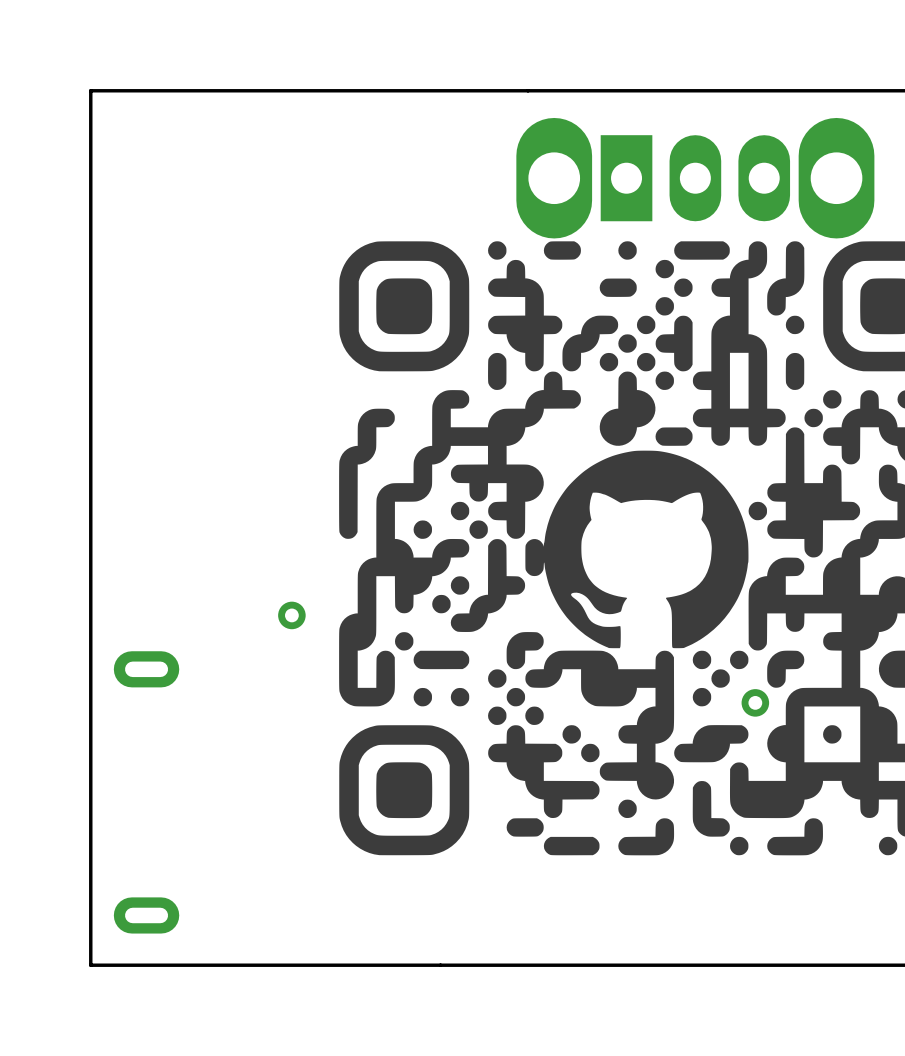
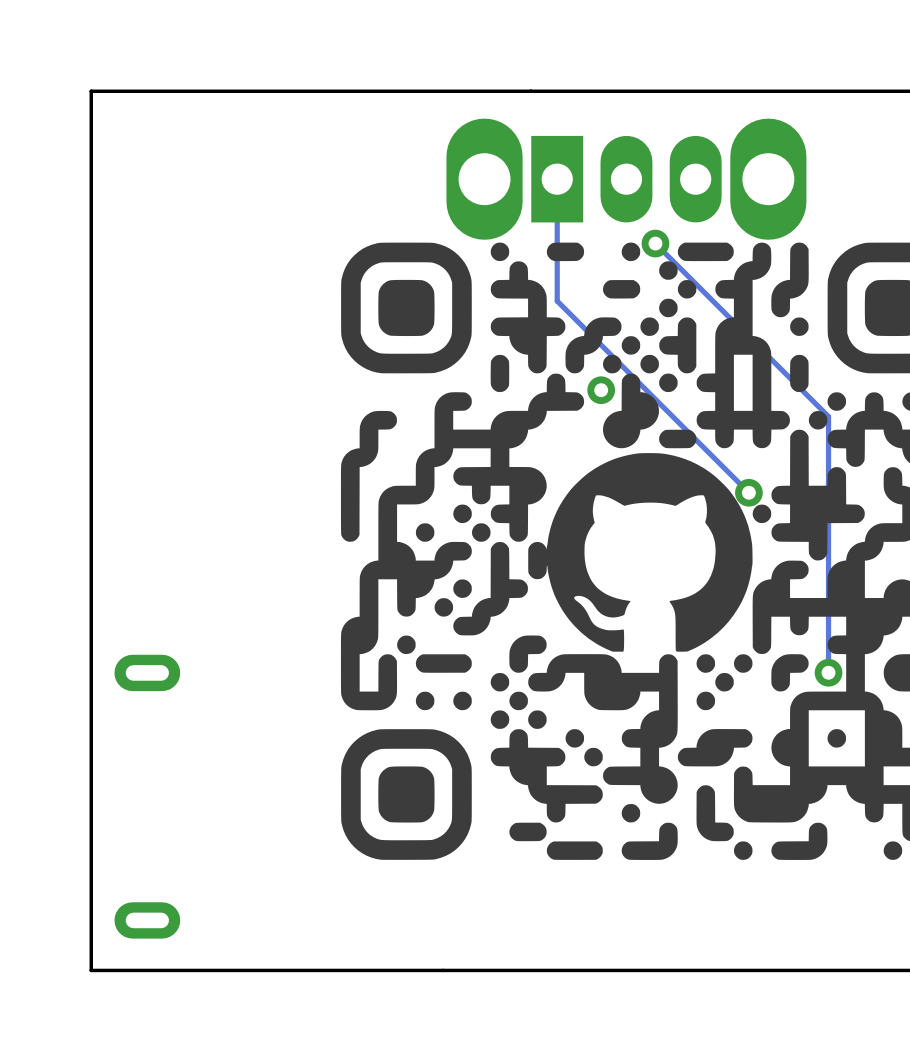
track: none -> (557, 179) (557, 301) (748, 492)
part position: (695, 178) -> (626, 179)
track: none -> (655, 243) (828, 416) (828, 672)
via: none -> (655, 243)
via: none -> (601, 390)
via: none -> (748, 492)
via: (291, 615) -> none
via position: (755, 702) -> (828, 672)

